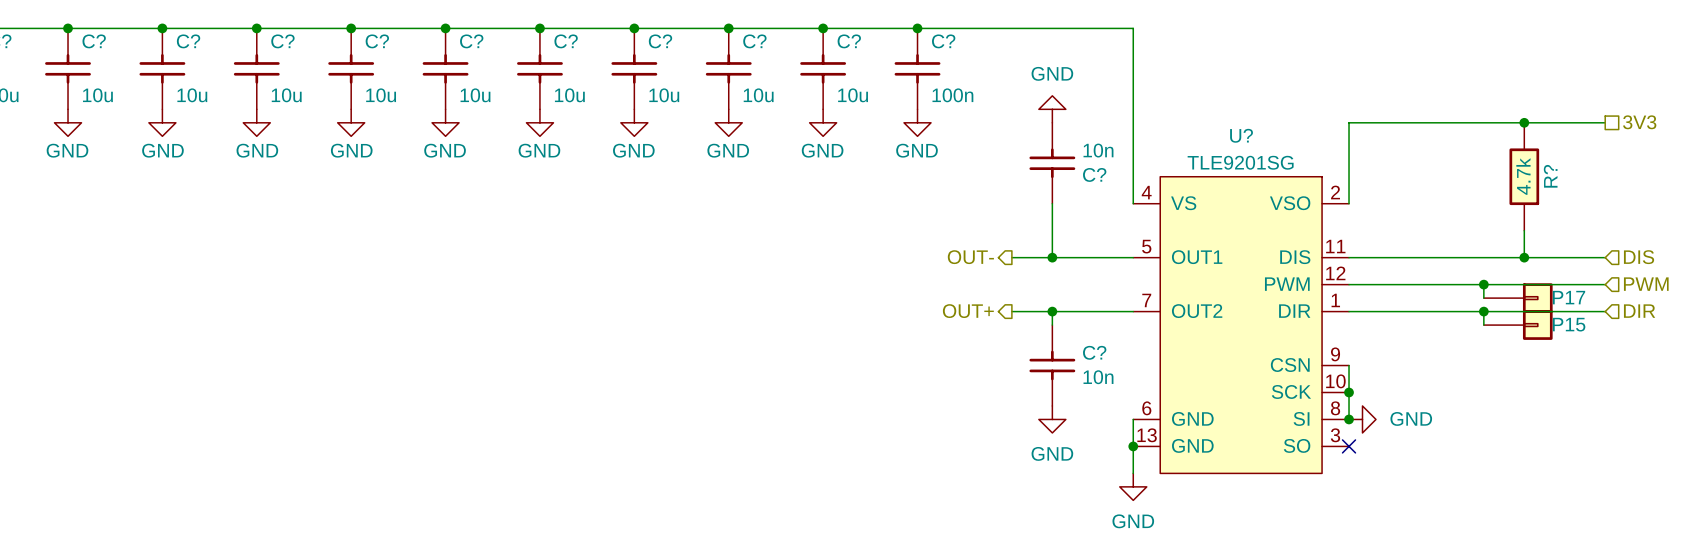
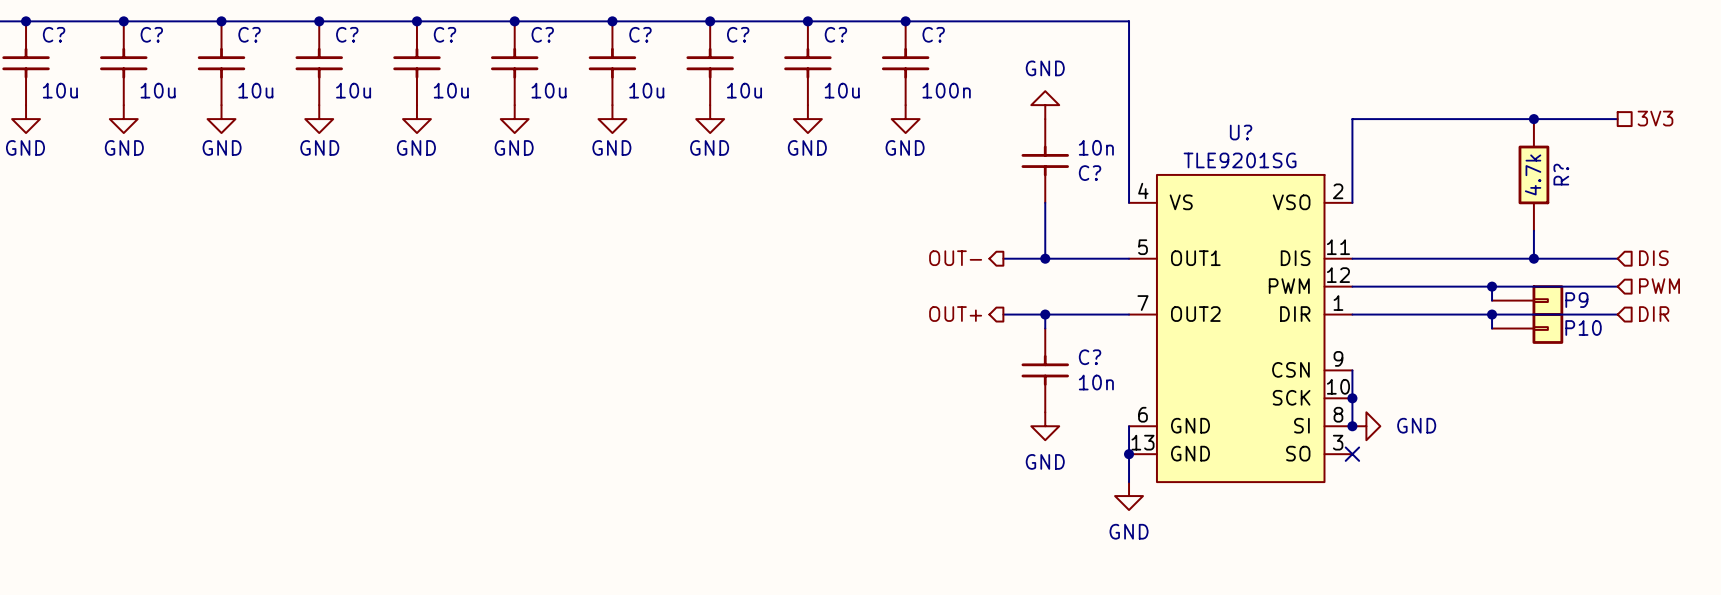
P17 name: P17 (1569, 297) -> P9 (1576, 300)
P15 name: P15 (1569, 324) -> P10 (1583, 327)

